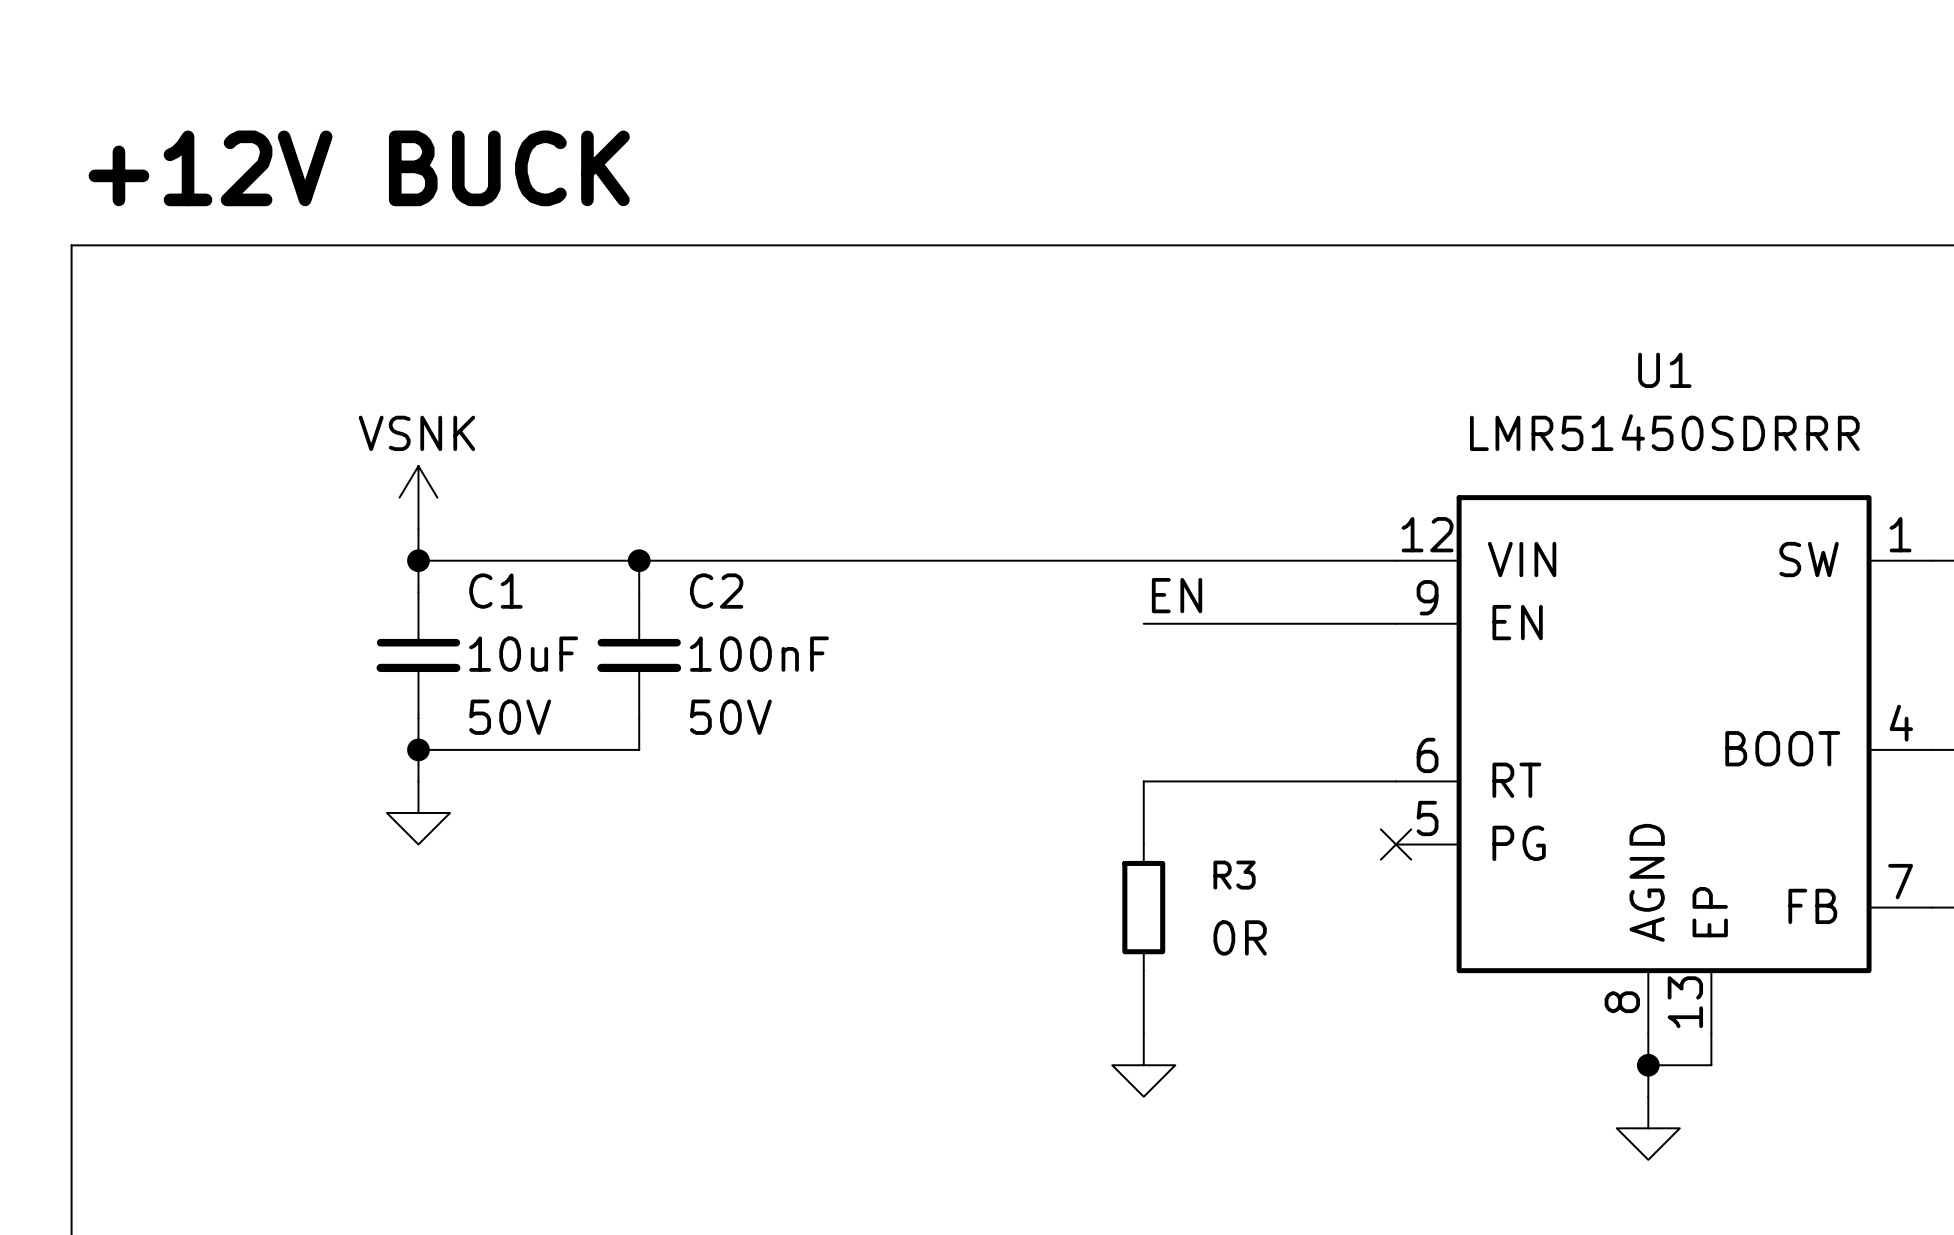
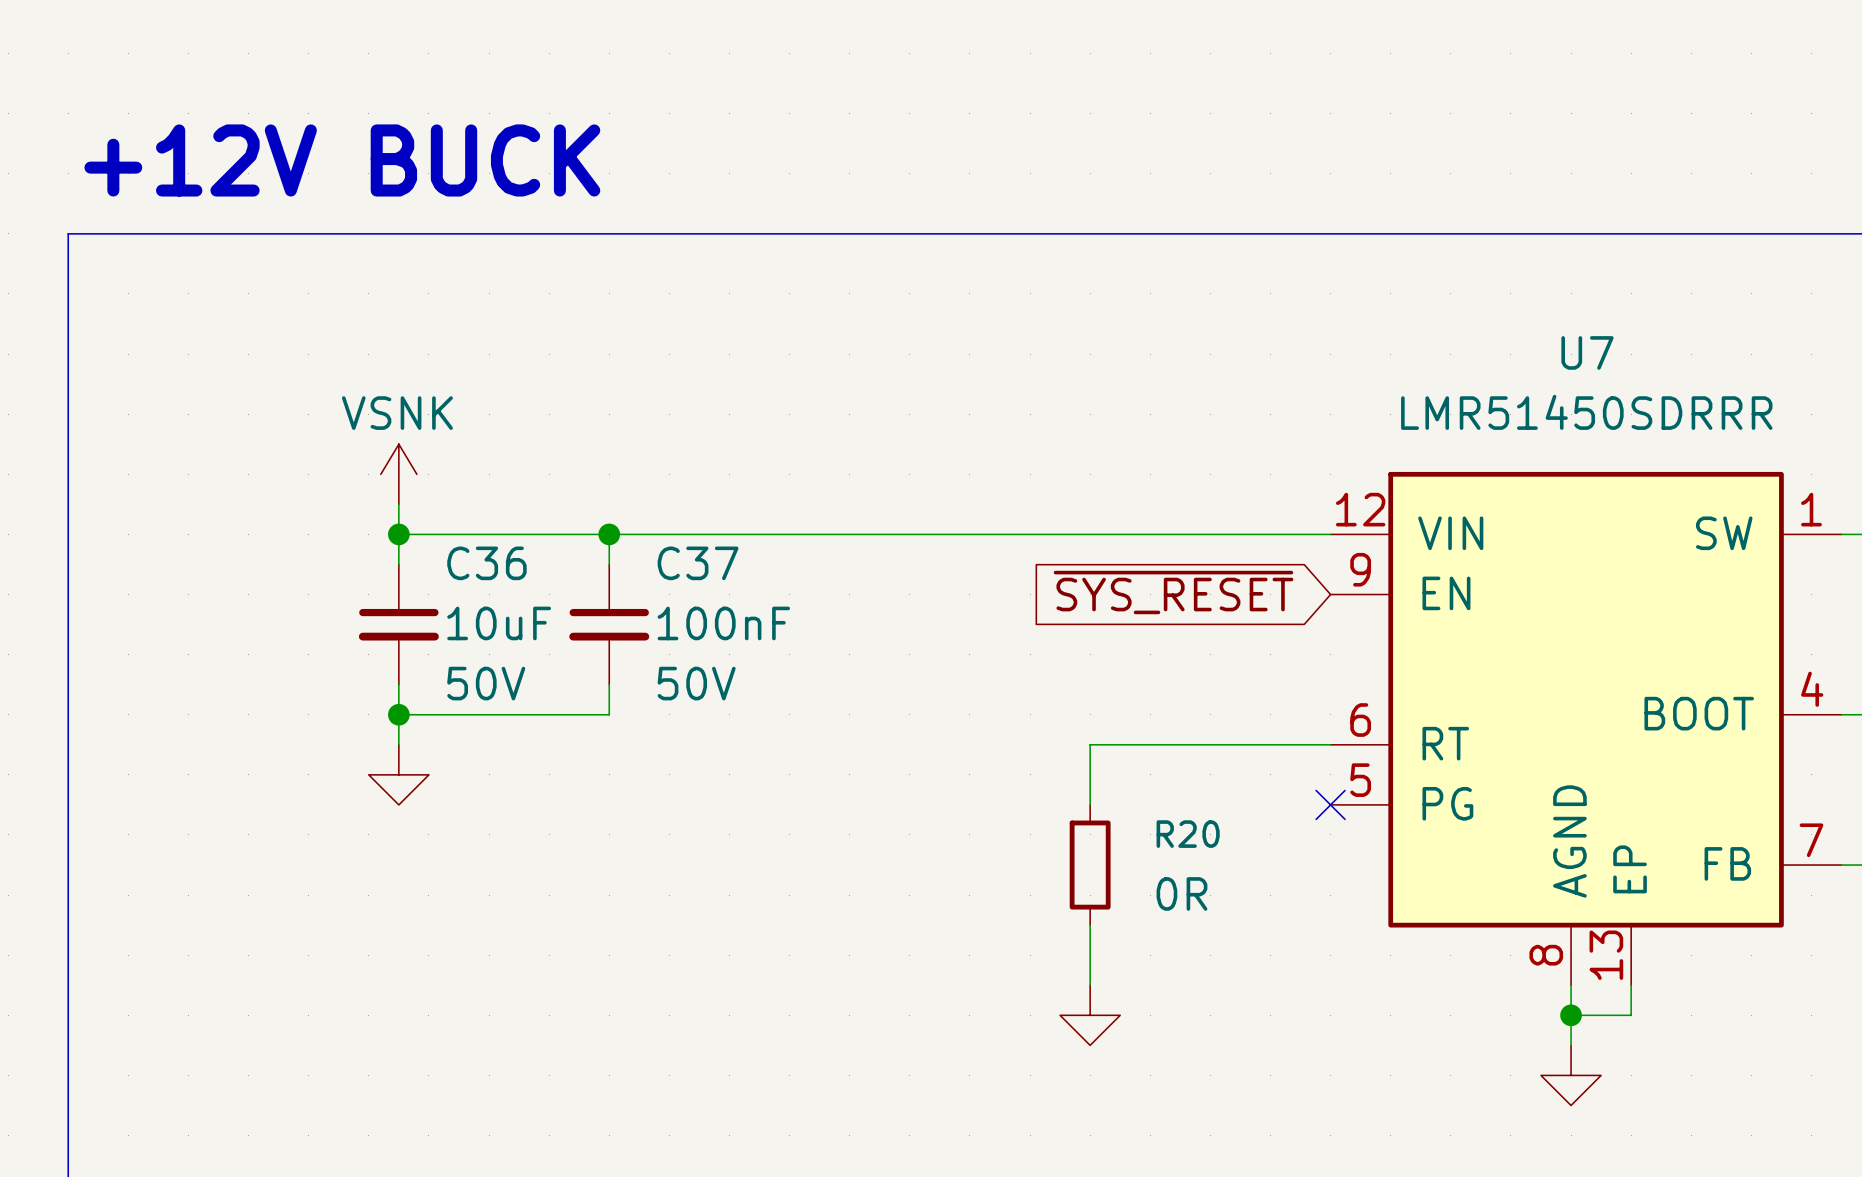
U1 name: U1 (1664, 370) -> U7 (1587, 352)
C1 name: C1 (495, 591) -> C36 (486, 563)
C2 name: C2 (716, 591) -> C37 (698, 563)
label: EN (1177, 595) -> none
global label: none -> ~{SYS_RESET} (1173, 592)
wire: (1143, 623) (1396, 623) -> none
R3 name: R3 (1234, 875) -> R20 (1188, 834)

